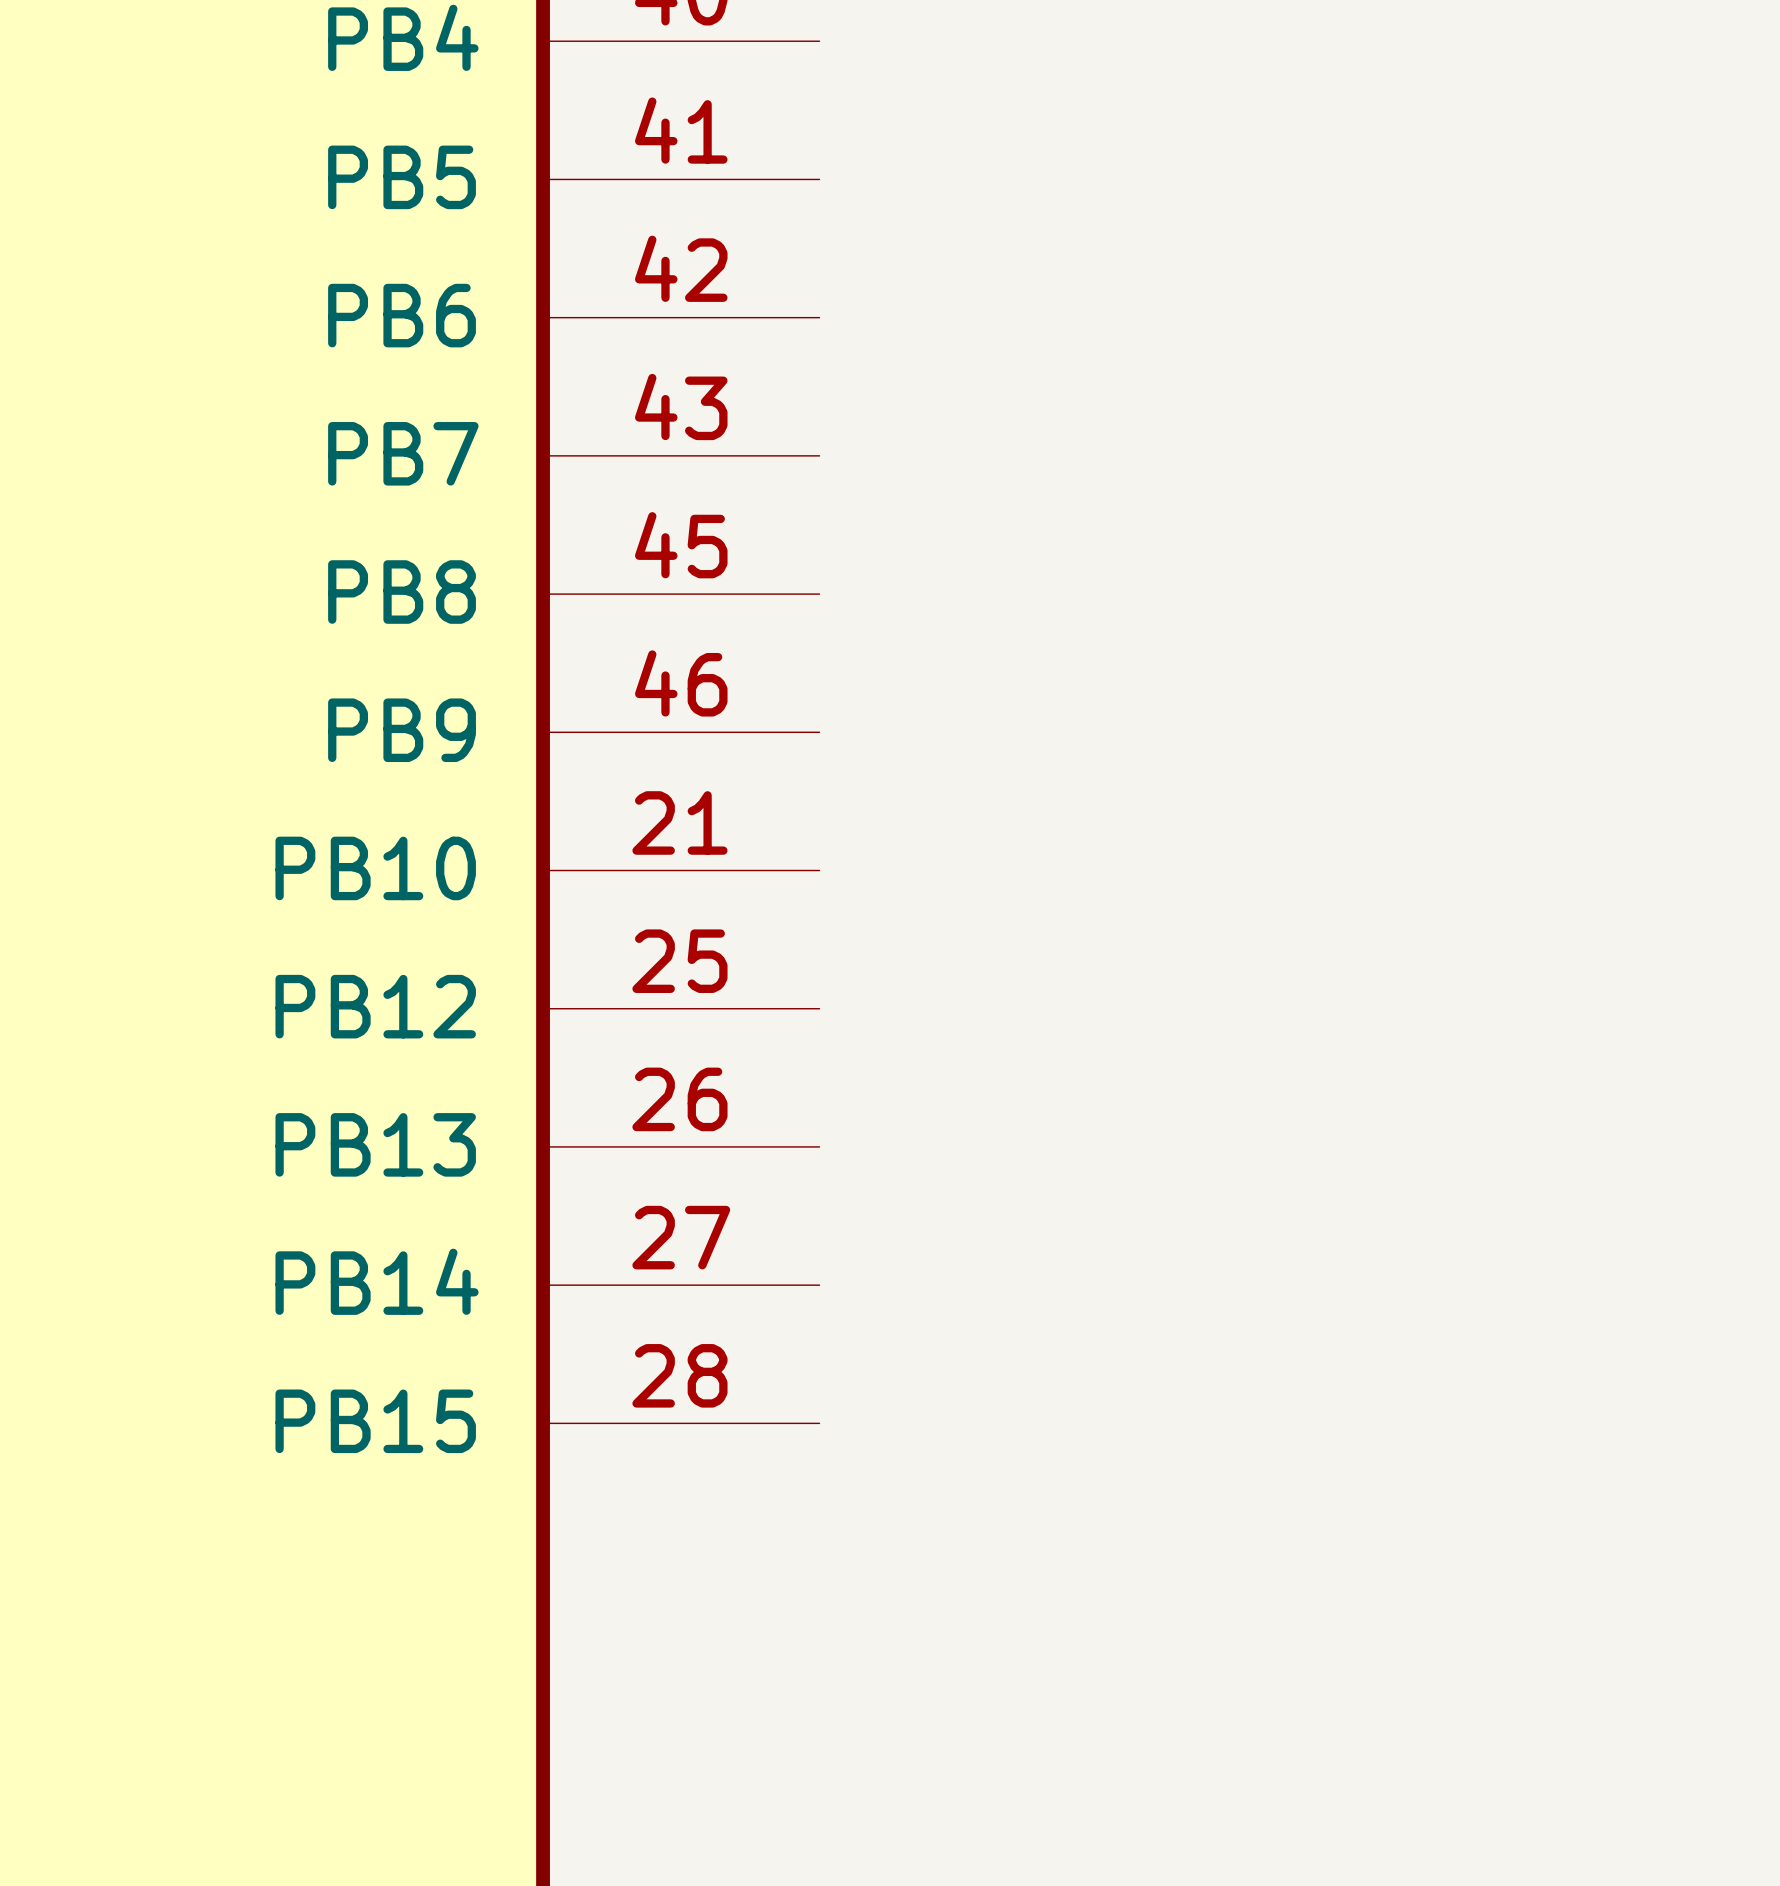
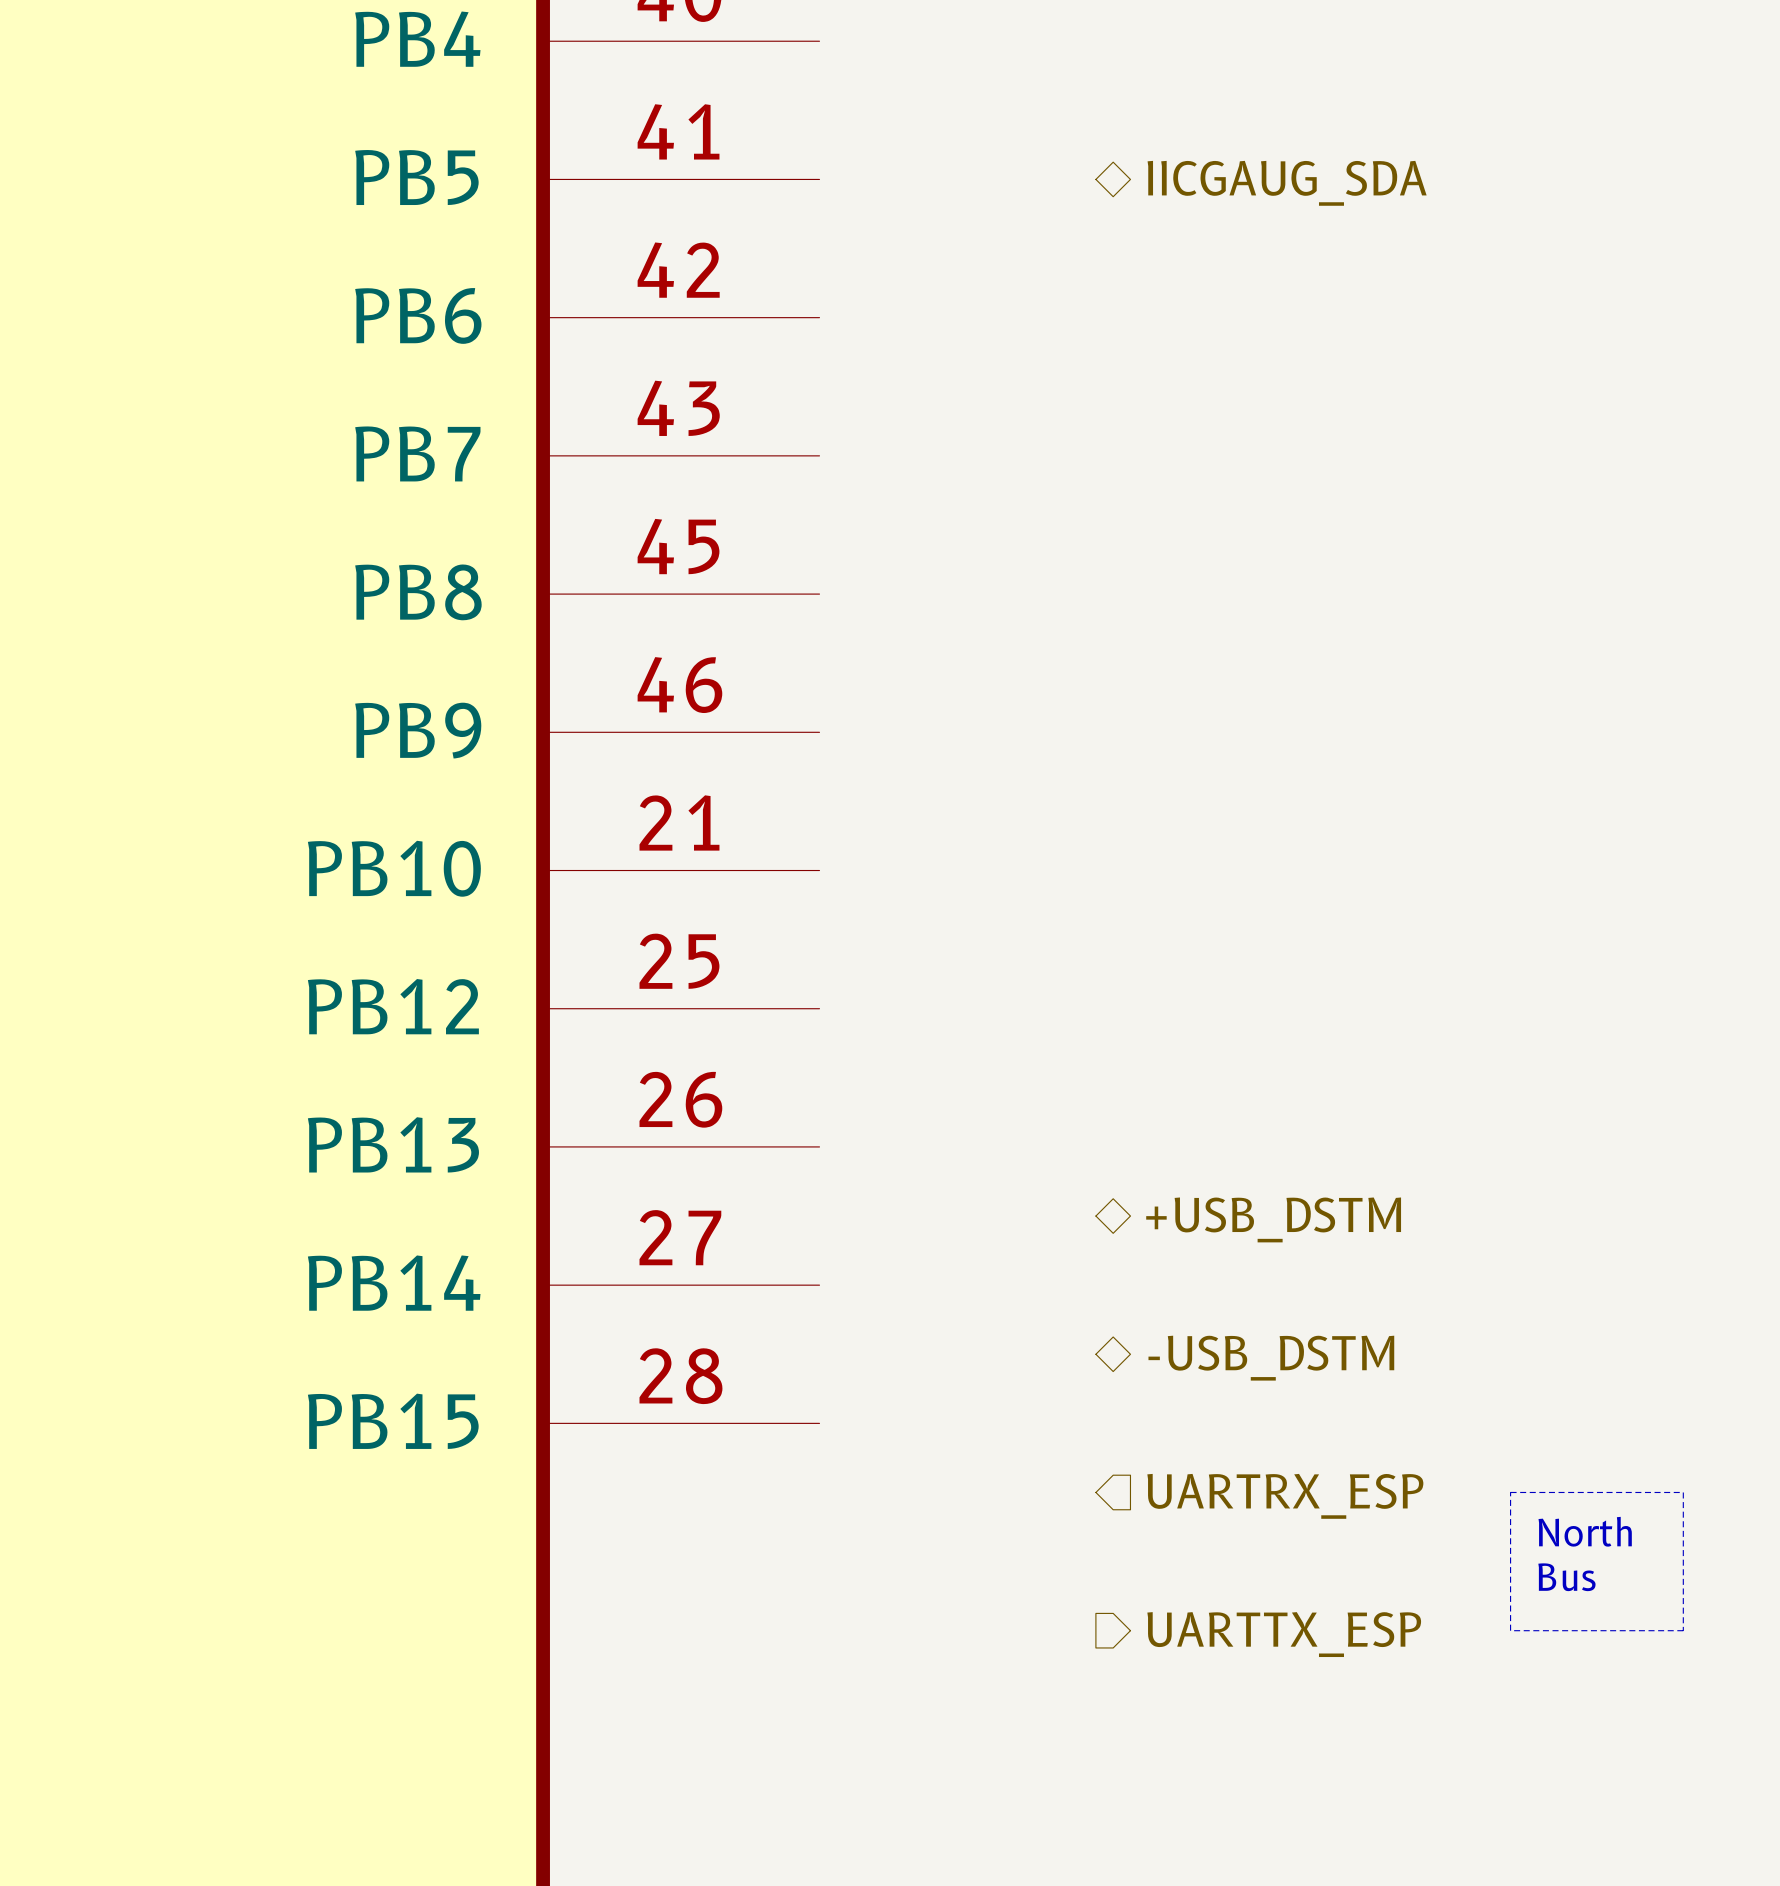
hierarchical label: none -> IICGAUG_SDA (1287, 183)
hierarchical label: none -> +USB_DSTM (1273, 1219)
hierarchical label: none -> -USB_DSTM (1271, 1358)
hierarchical label: none -> UARTRX_ESP (1285, 1496)
line: none -> (1510, 1492) (1683, 1492) (1683, 1630) (1510, 1630) (1510, 1492)
text: none -> North (1585, 1531)
text: none -> Bus (1566, 1577)
hierarchical label: none -> UARTTX_ESP (1284, 1634)

